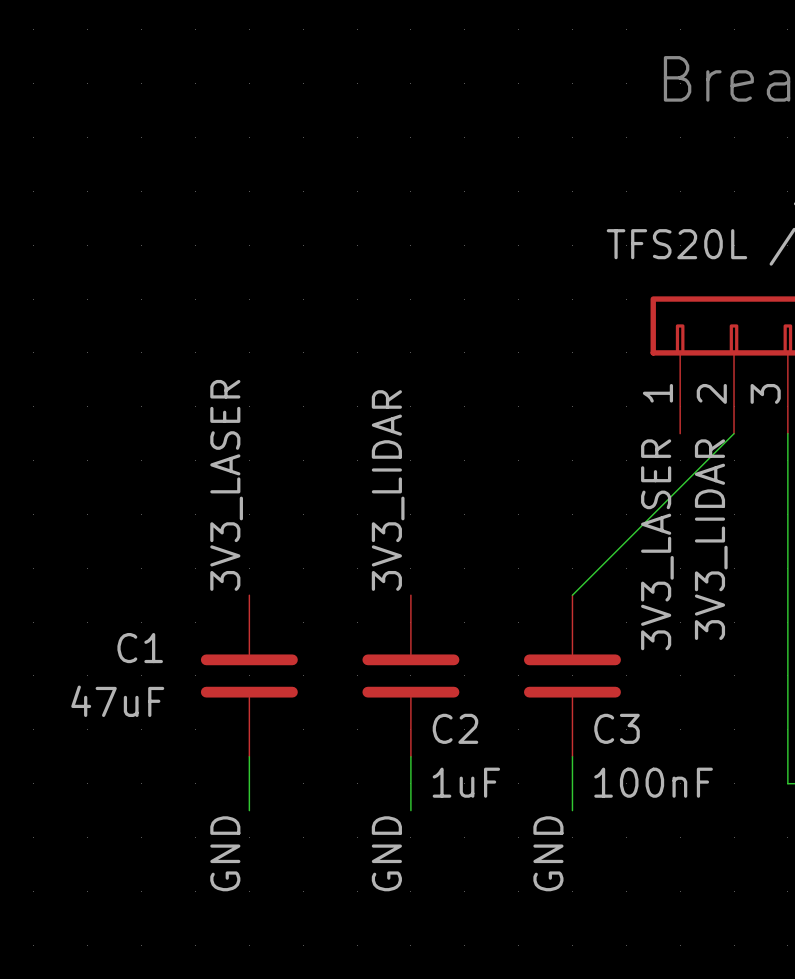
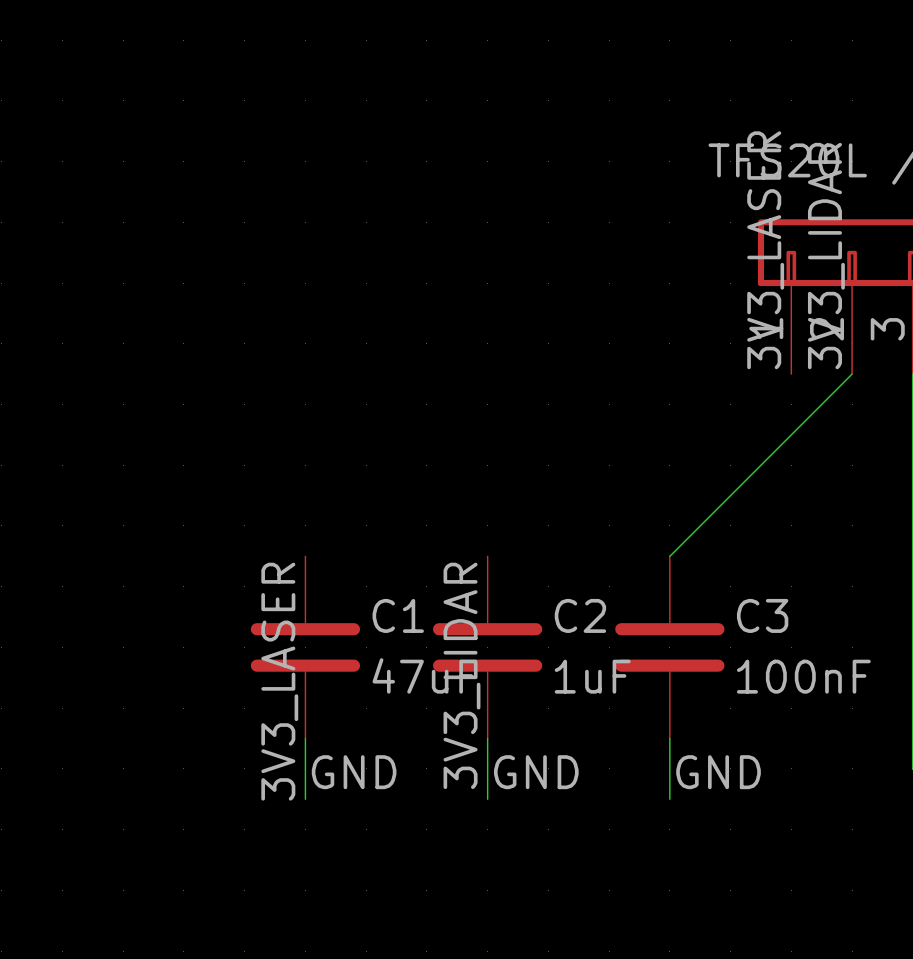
label position: 3V3_LASER (226, 485) -> 3V3_LASER (279, 681)
label position: 3V3_LIDAR (388, 490) -> 3V3_LIDAR (461, 675)
label position: 3V3_LIDAR (711, 539) -> 3V3_LIDAR (826, 256)
label position: 3V3_LASER (657, 544) -> 3V3_LASER (765, 250)
C1 name position: C1 (140, 648) -> C1 (398, 615)
C1 value position: 47uF (117, 701) -> 47uF (424, 675)
C2 name position: C2 (455, 728) -> C2 (580, 615)
C3 name position: C3 (617, 728) -> C3 (762, 615)
C2 value position: 1uF (466, 782) -> 1uF (592, 676)
C3 value position: 100nF (653, 782) -> 100nF (803, 676)
label rotation: 0° (225, 853) -> 90° clockwise (354, 772)
label position: GND (225, 853) -> GND (354, 772)
label rotation: 0° (386, 853) -> 90° clockwise (536, 772)
label position: GND (386, 853) -> GND (536, 772)
label rotation: 0° (548, 853) -> 90° clockwise (718, 772)
label position: GND (548, 853) -> GND (718, 772)

